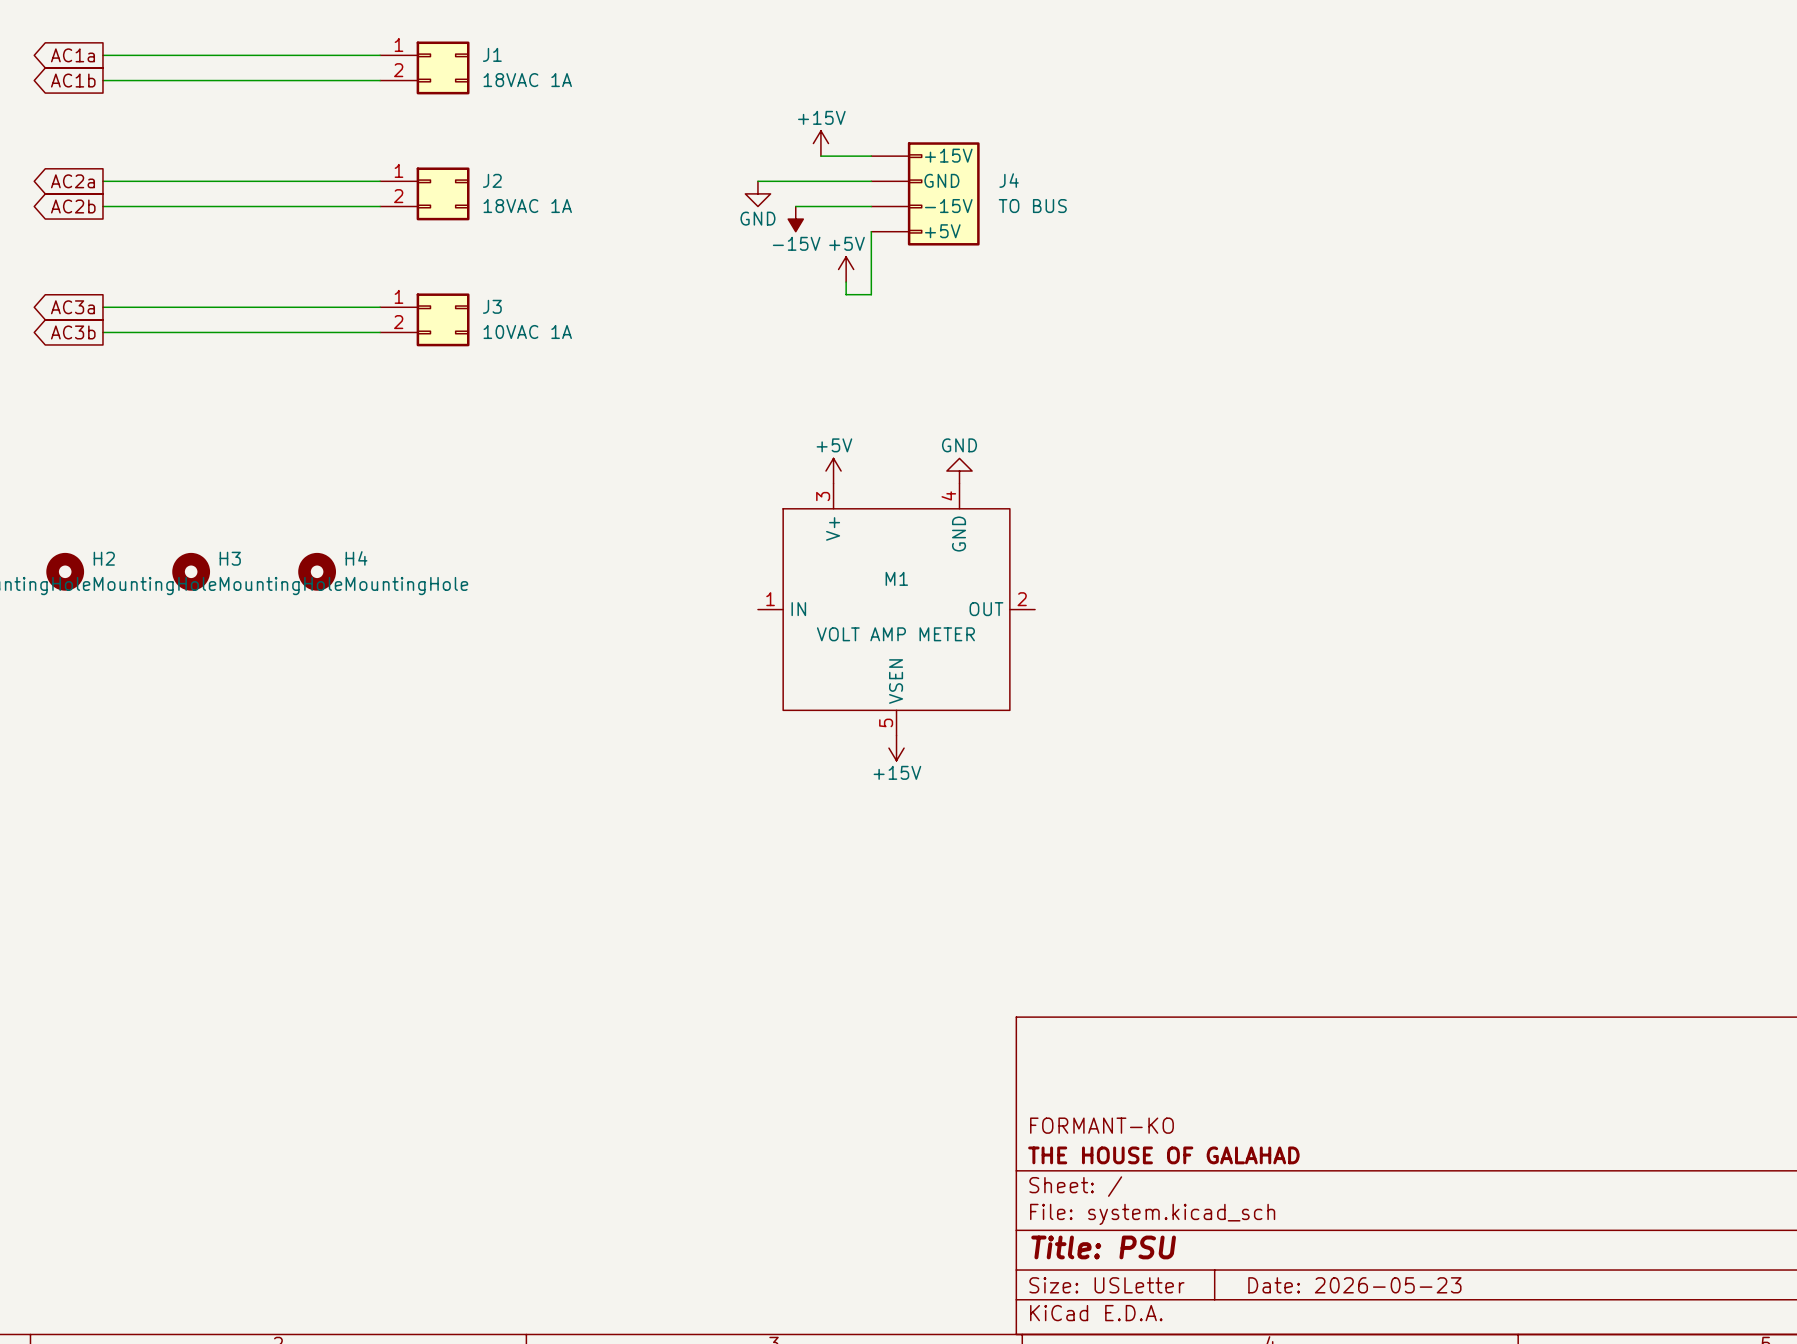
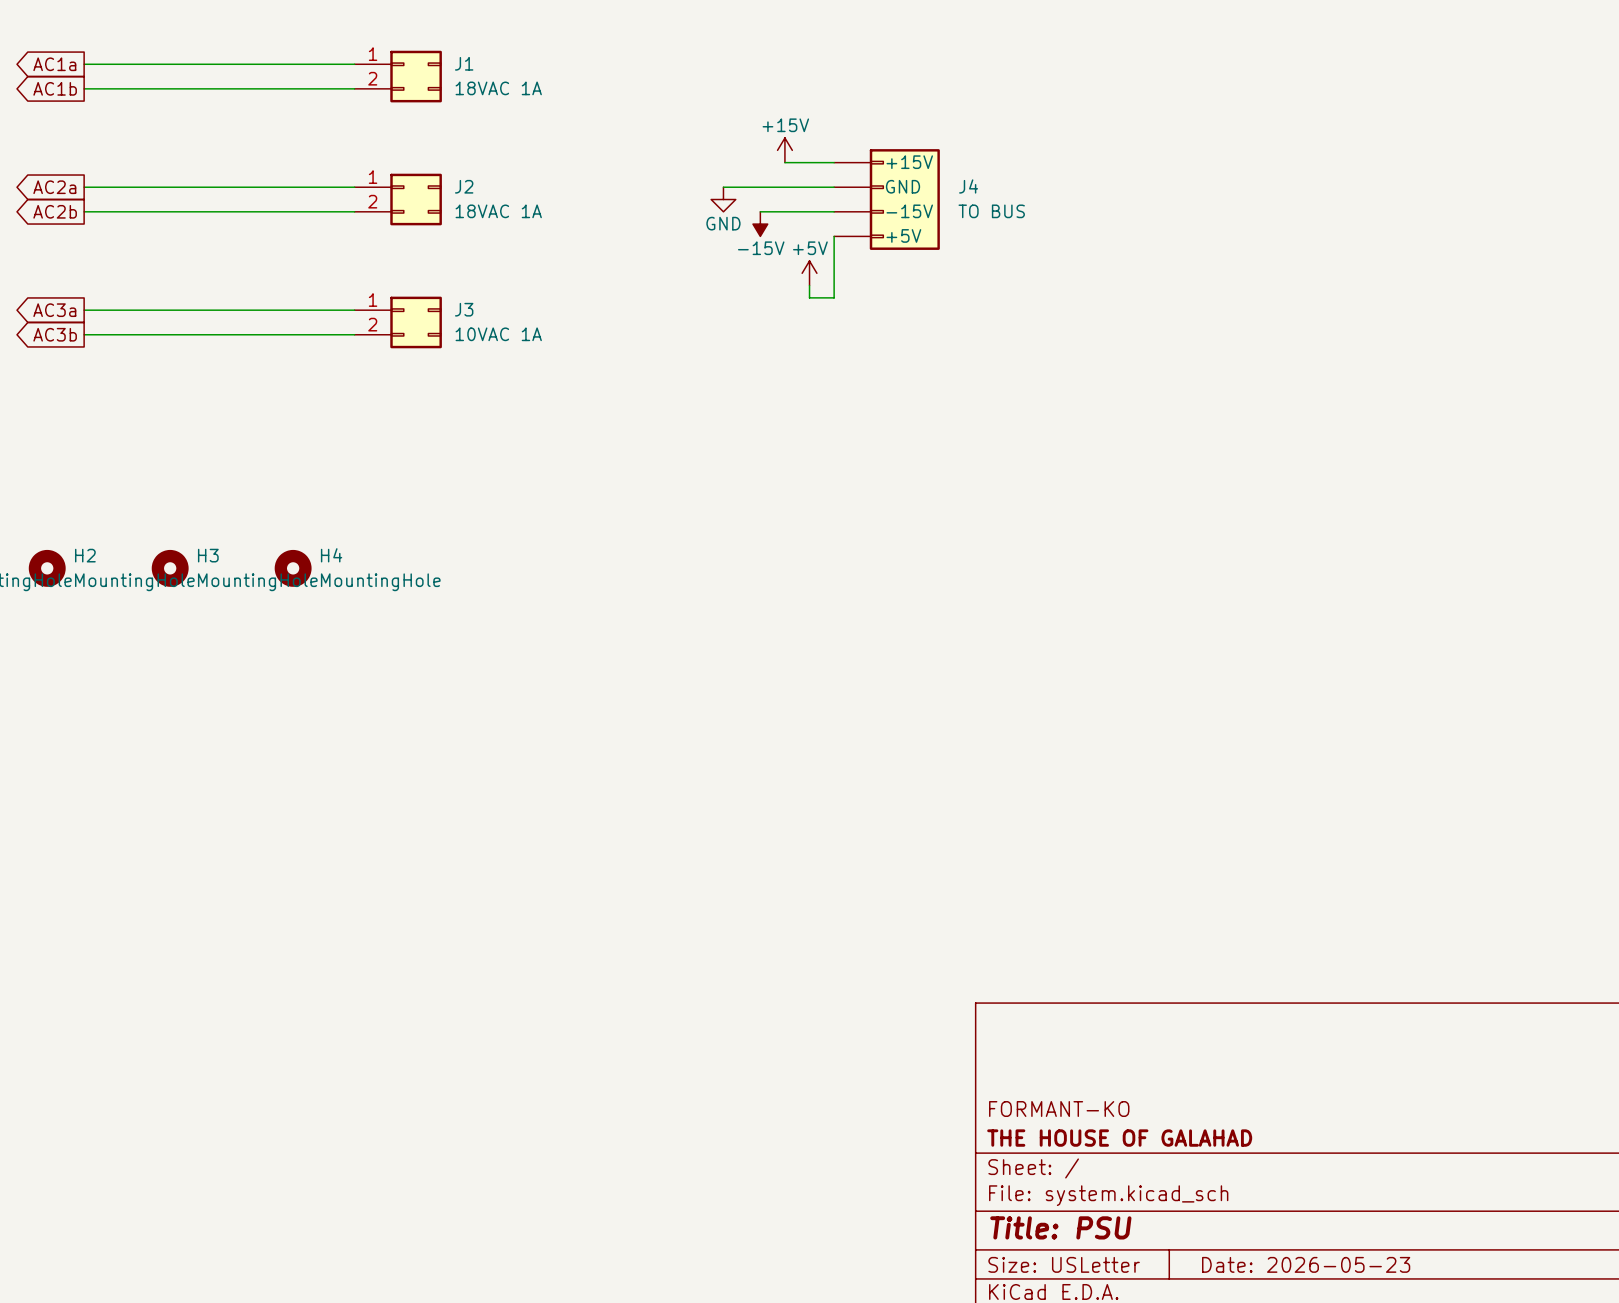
power symbol: +5V (833, 471) -> none
power symbol: GND (959, 471) -> none
M1: VOLT AMP METER (896, 609) -> none
power symbol: +15V (896, 748) -> none

